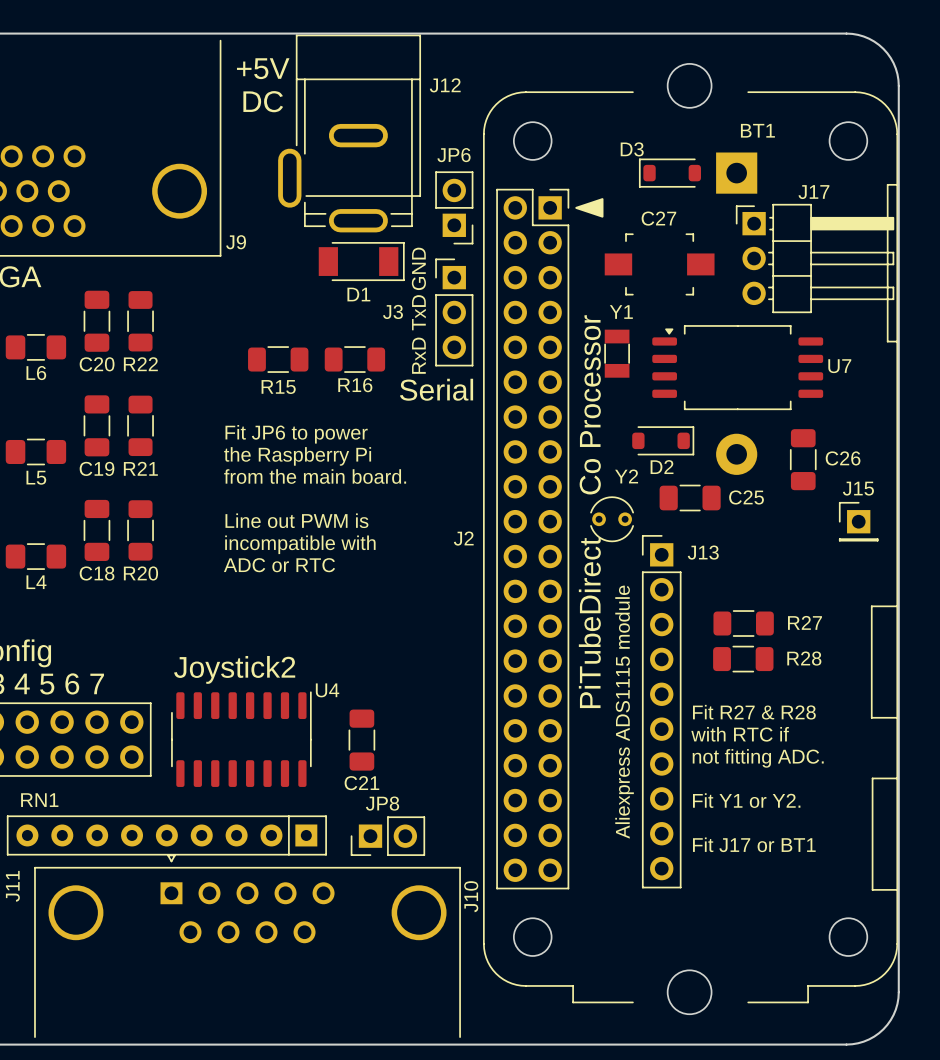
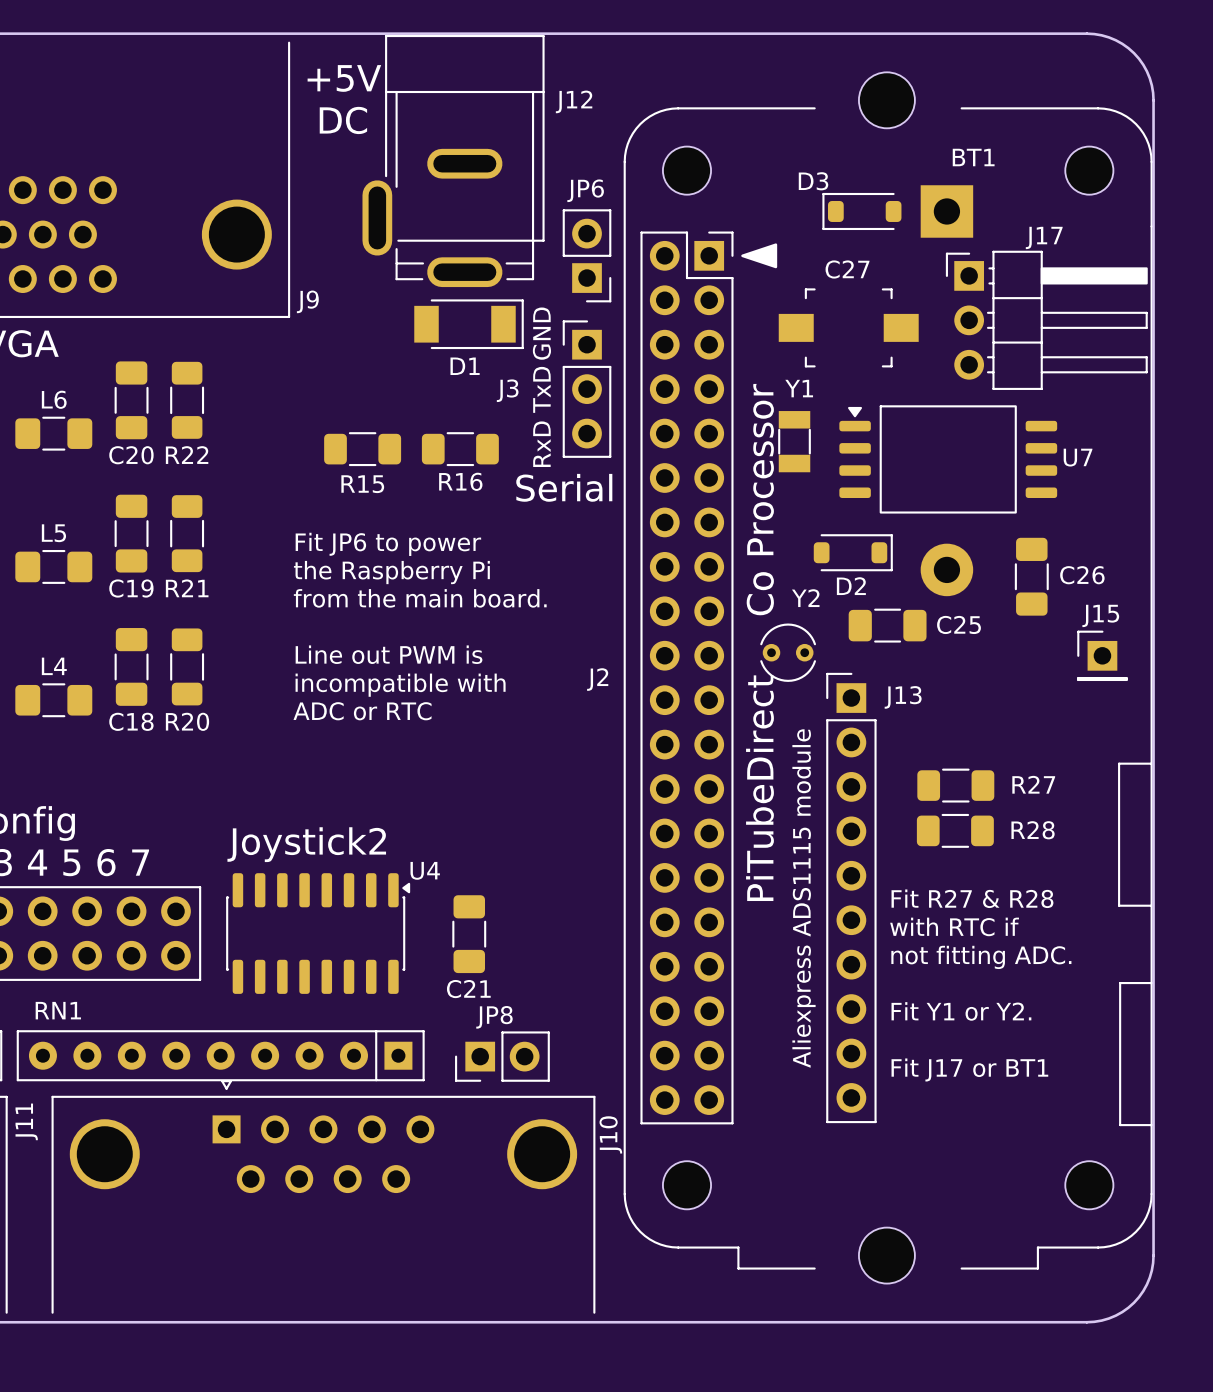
J2 footprint: [483, 91, 899, 1004] -> [623, 107, 1153, 1270]
U7 footprint: [652, 325, 824, 411] -> [839, 405, 1058, 514]
L6 name position: L6 (36, 373) -> L6 (54, 399)
L5 name position: L5 (36, 477) -> L5 (53, 533)
L4 name position: L4 (36, 582) -> L4 (54, 666)
U4 footprint: [171, 691, 312, 787] -> [226, 873, 411, 994]

